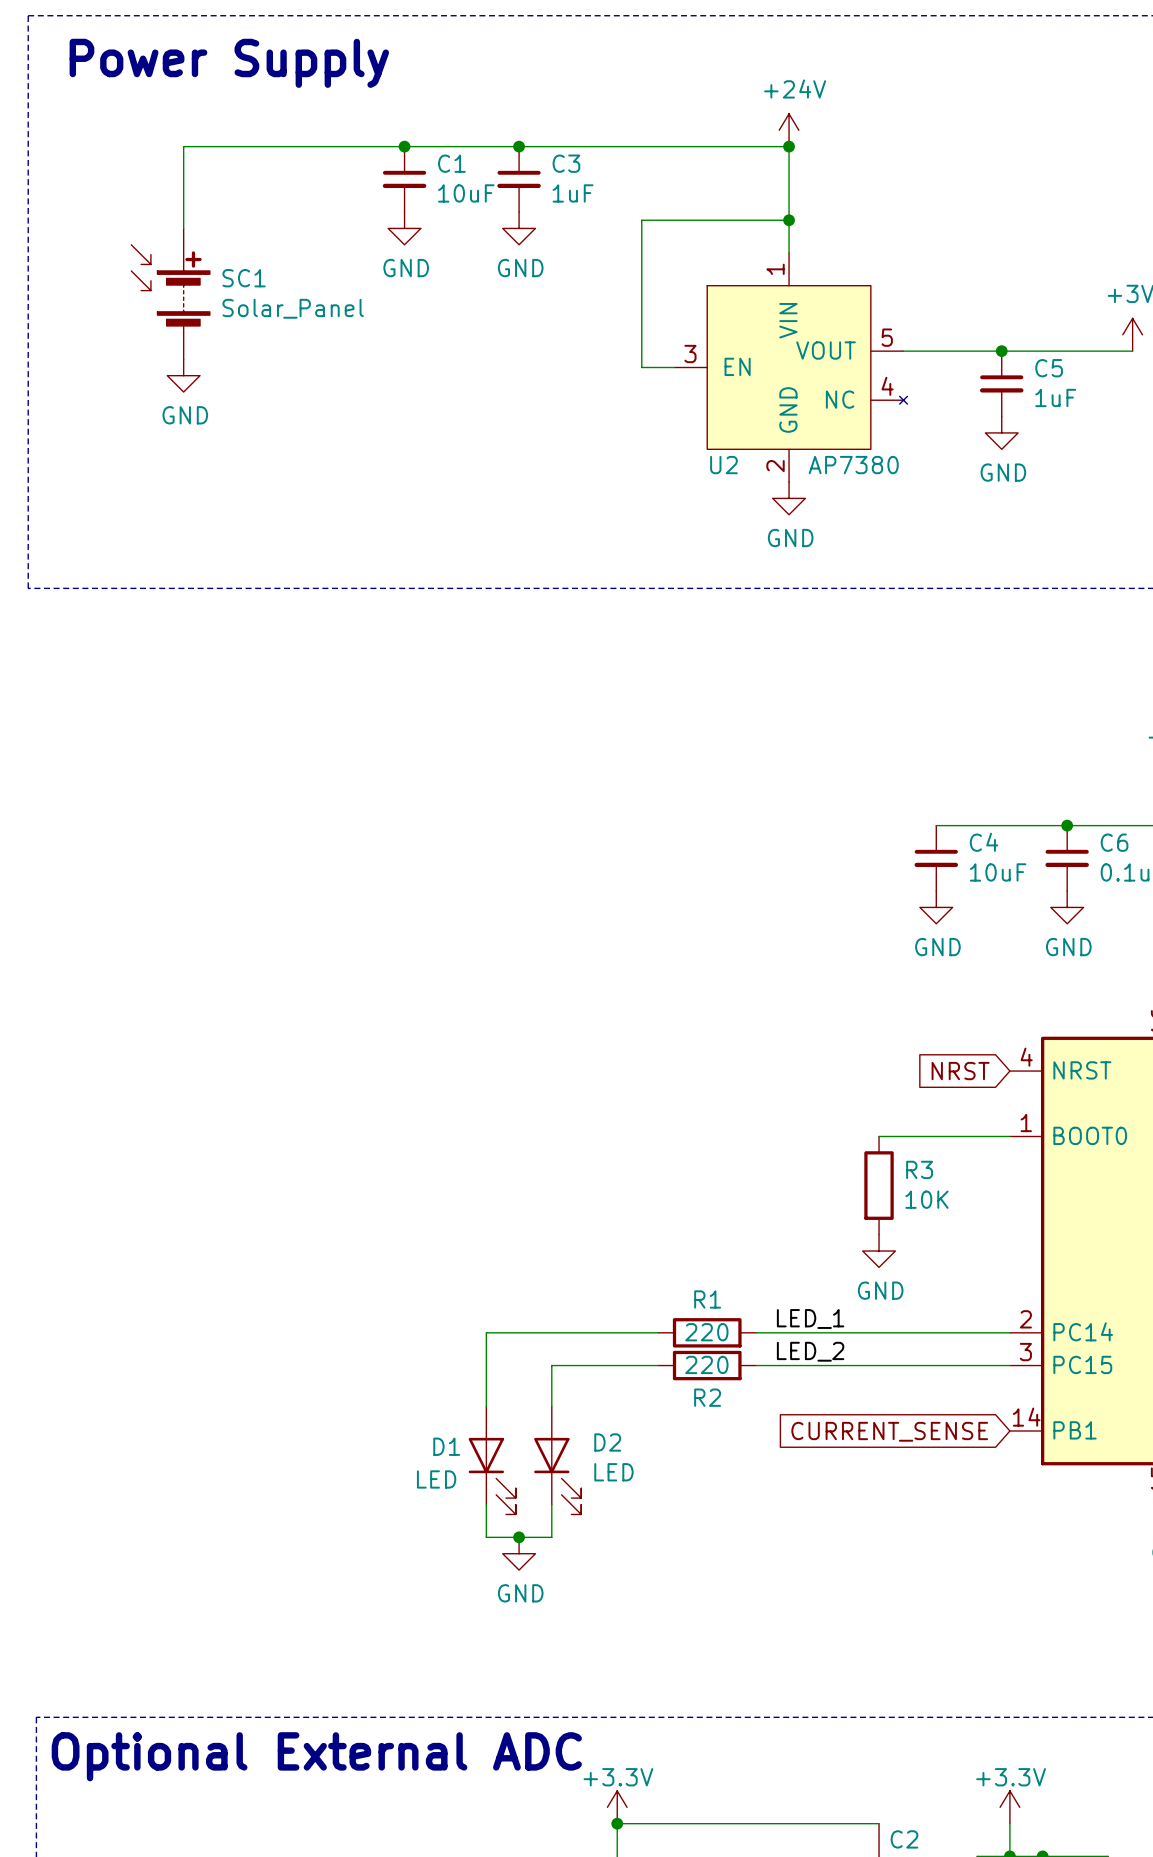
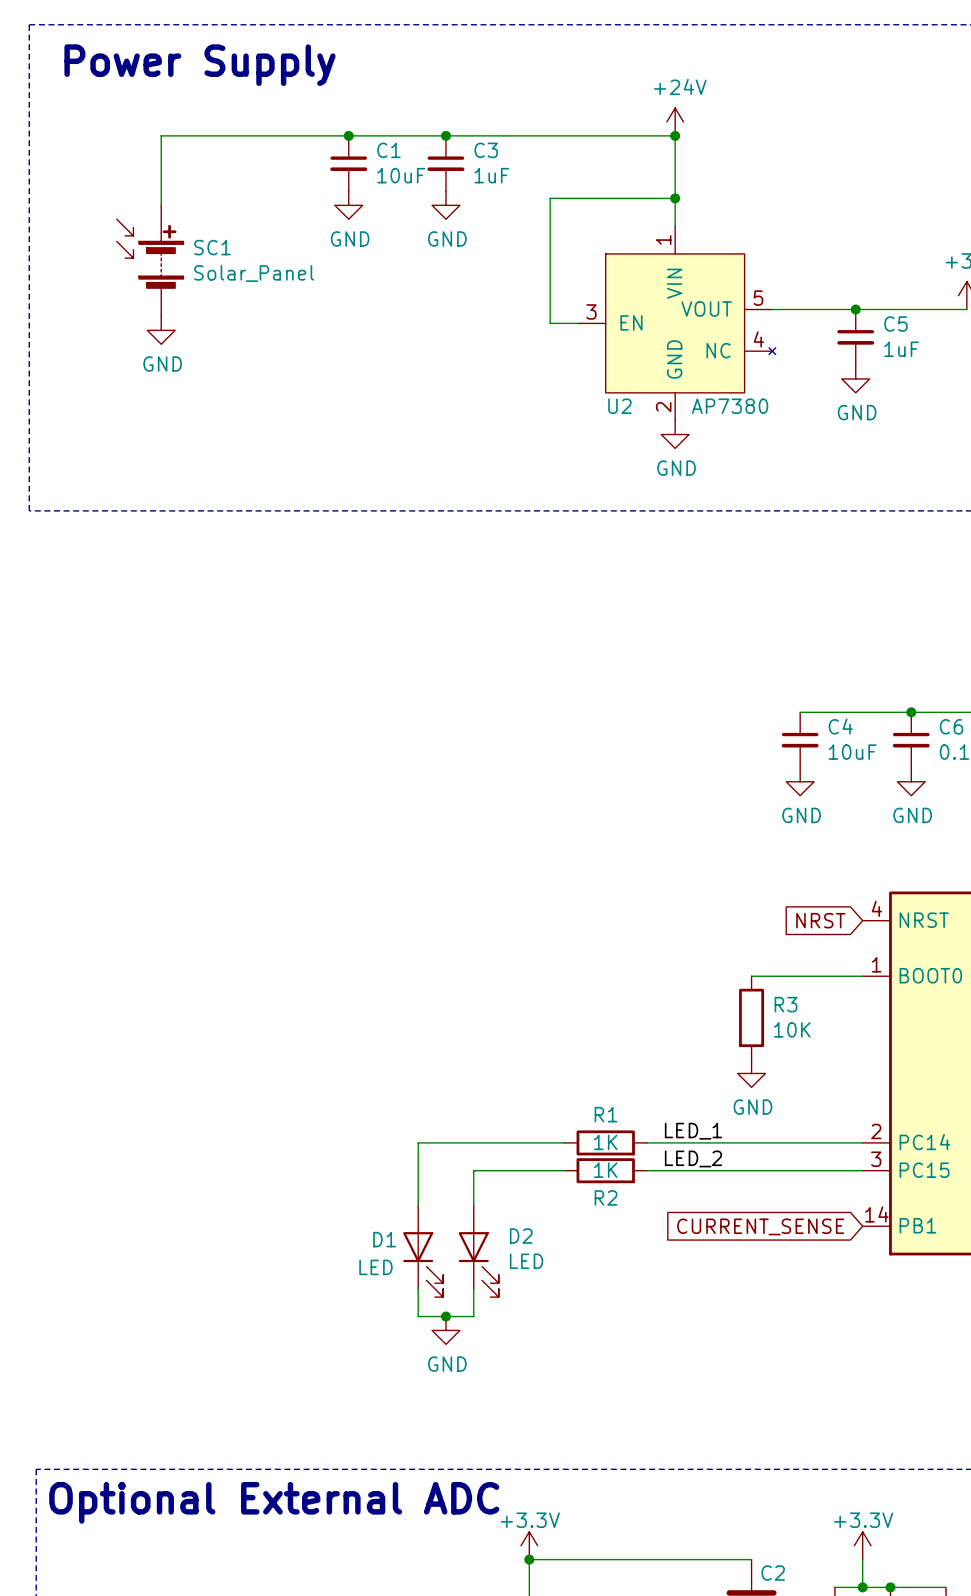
R1 value: 220 (706, 1332) -> 1K (605, 1142)
R2 value: 220 (706, 1364) -> 1K (605, 1170)

